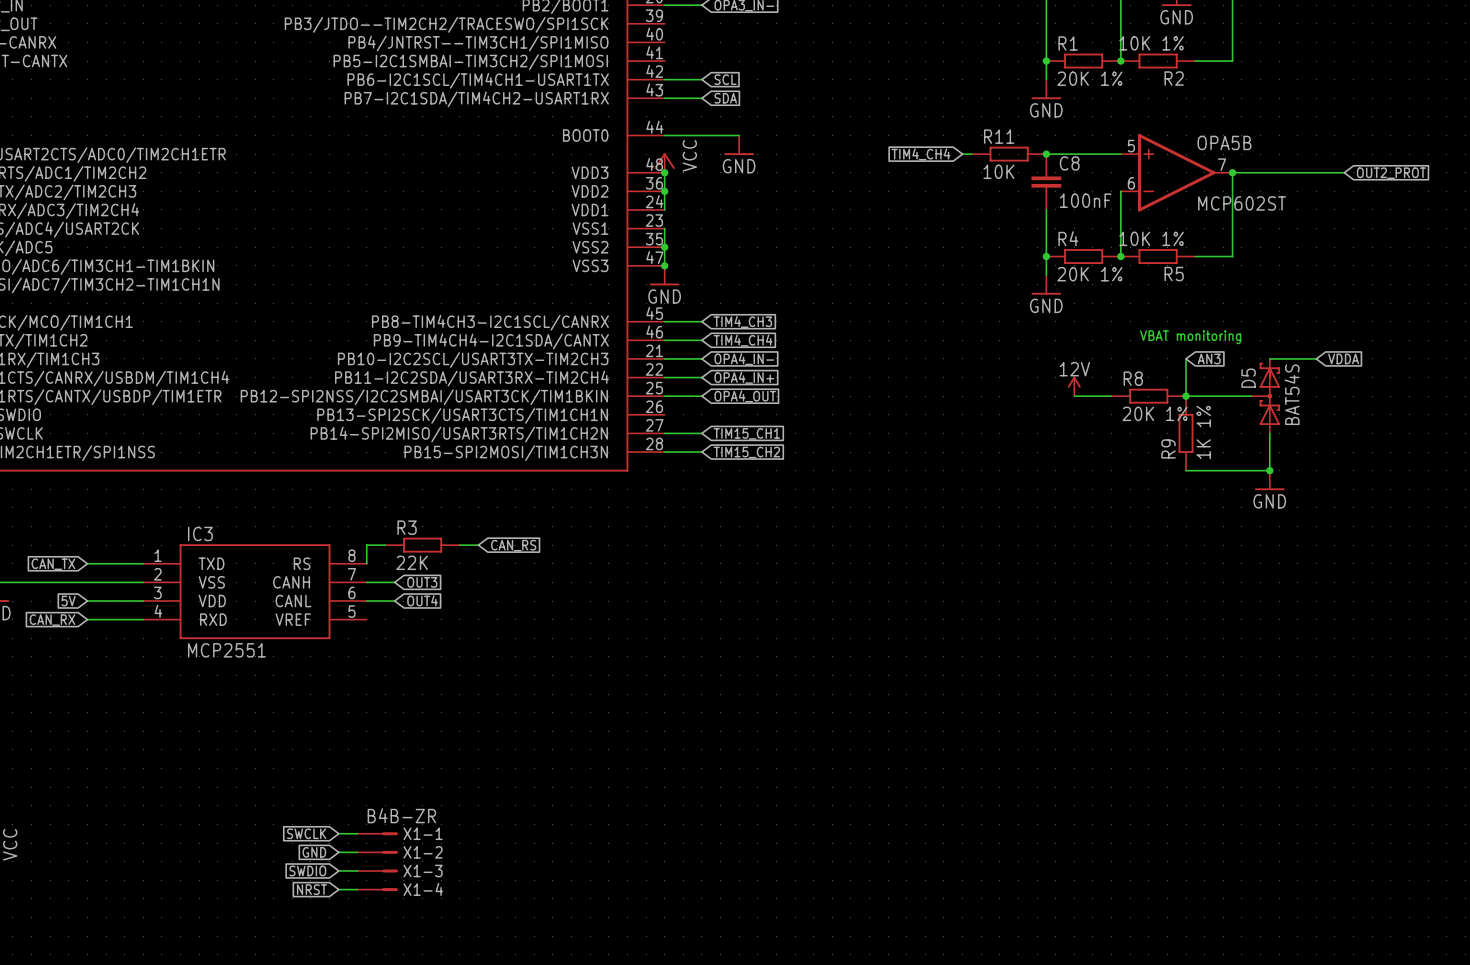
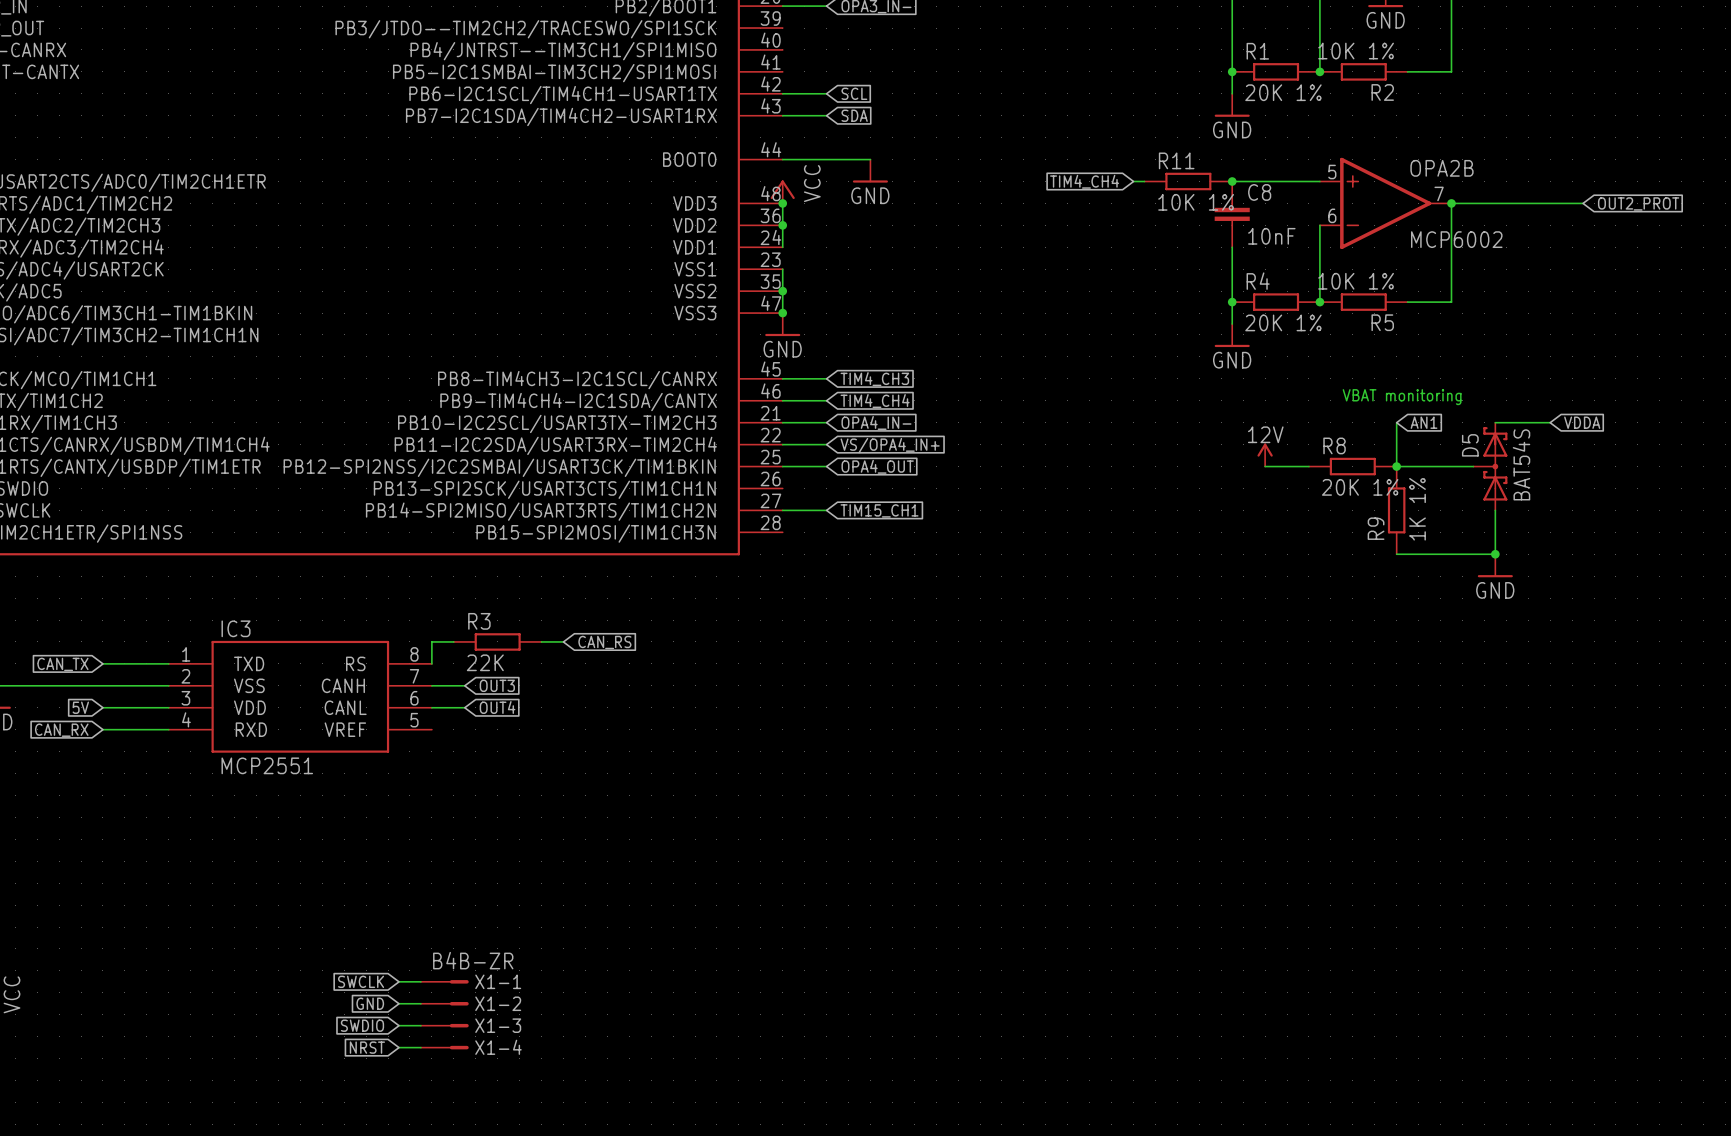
OPA5B name: OPA5B (1224, 142) -> OPA2B (1441, 168)
R11 value: 10K (998, 171) -> 10K 1% (1196, 202)
C8 value: 100nF (1085, 200) -> 10nF (1271, 236)
OPA5B value: MCP602ST (1242, 203) -> MCP6002 (1456, 239)
global label: AN3 (1209, 358) -> AN1 (1424, 422)
global label: OPA4_IN+ (744, 377) -> VS/OPA4_IN+ (890, 445)
wire: (664, 452) (701, 452) -> none
global label: TIM15_CH2 (746, 452) -> none

